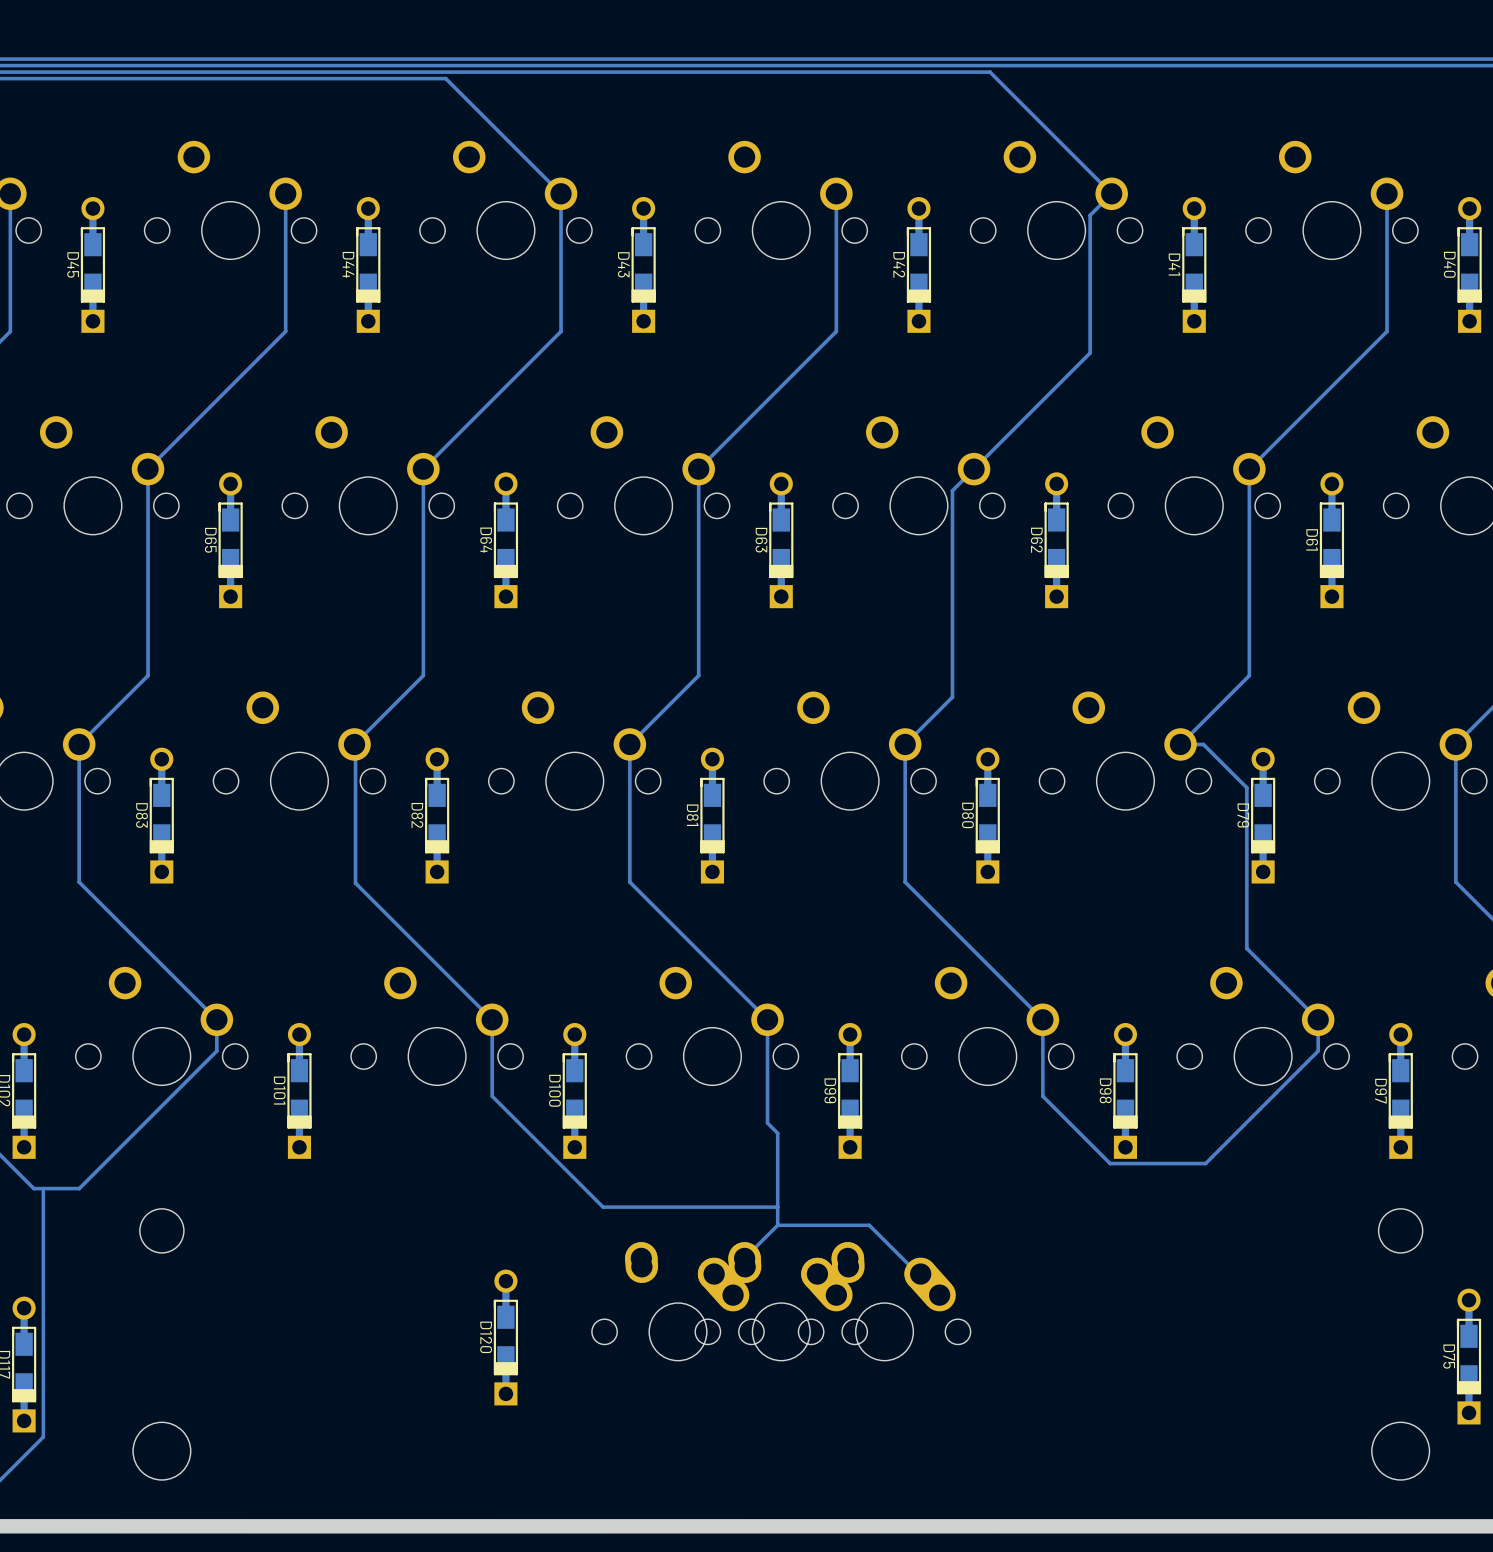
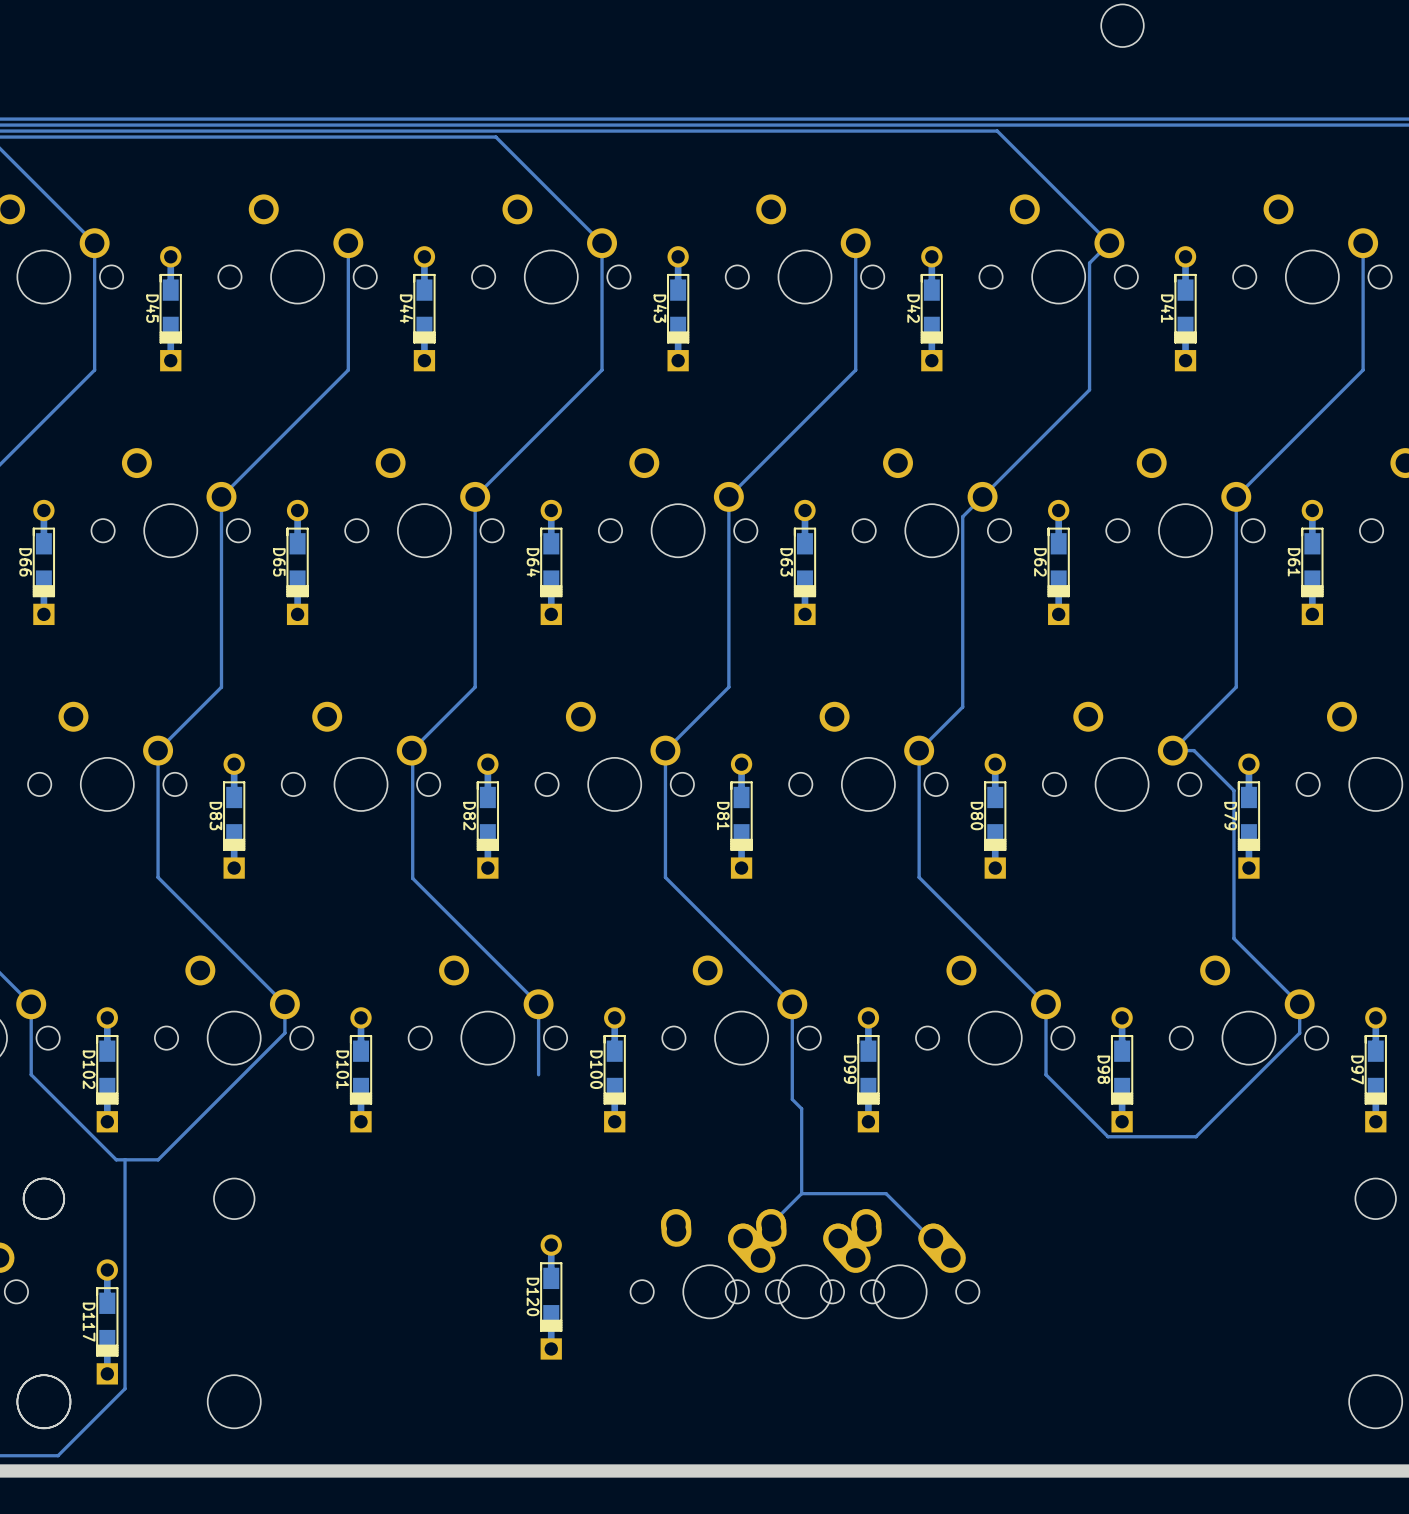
track: (492, 1096) (603, 1207) (777, 1207) -> none

